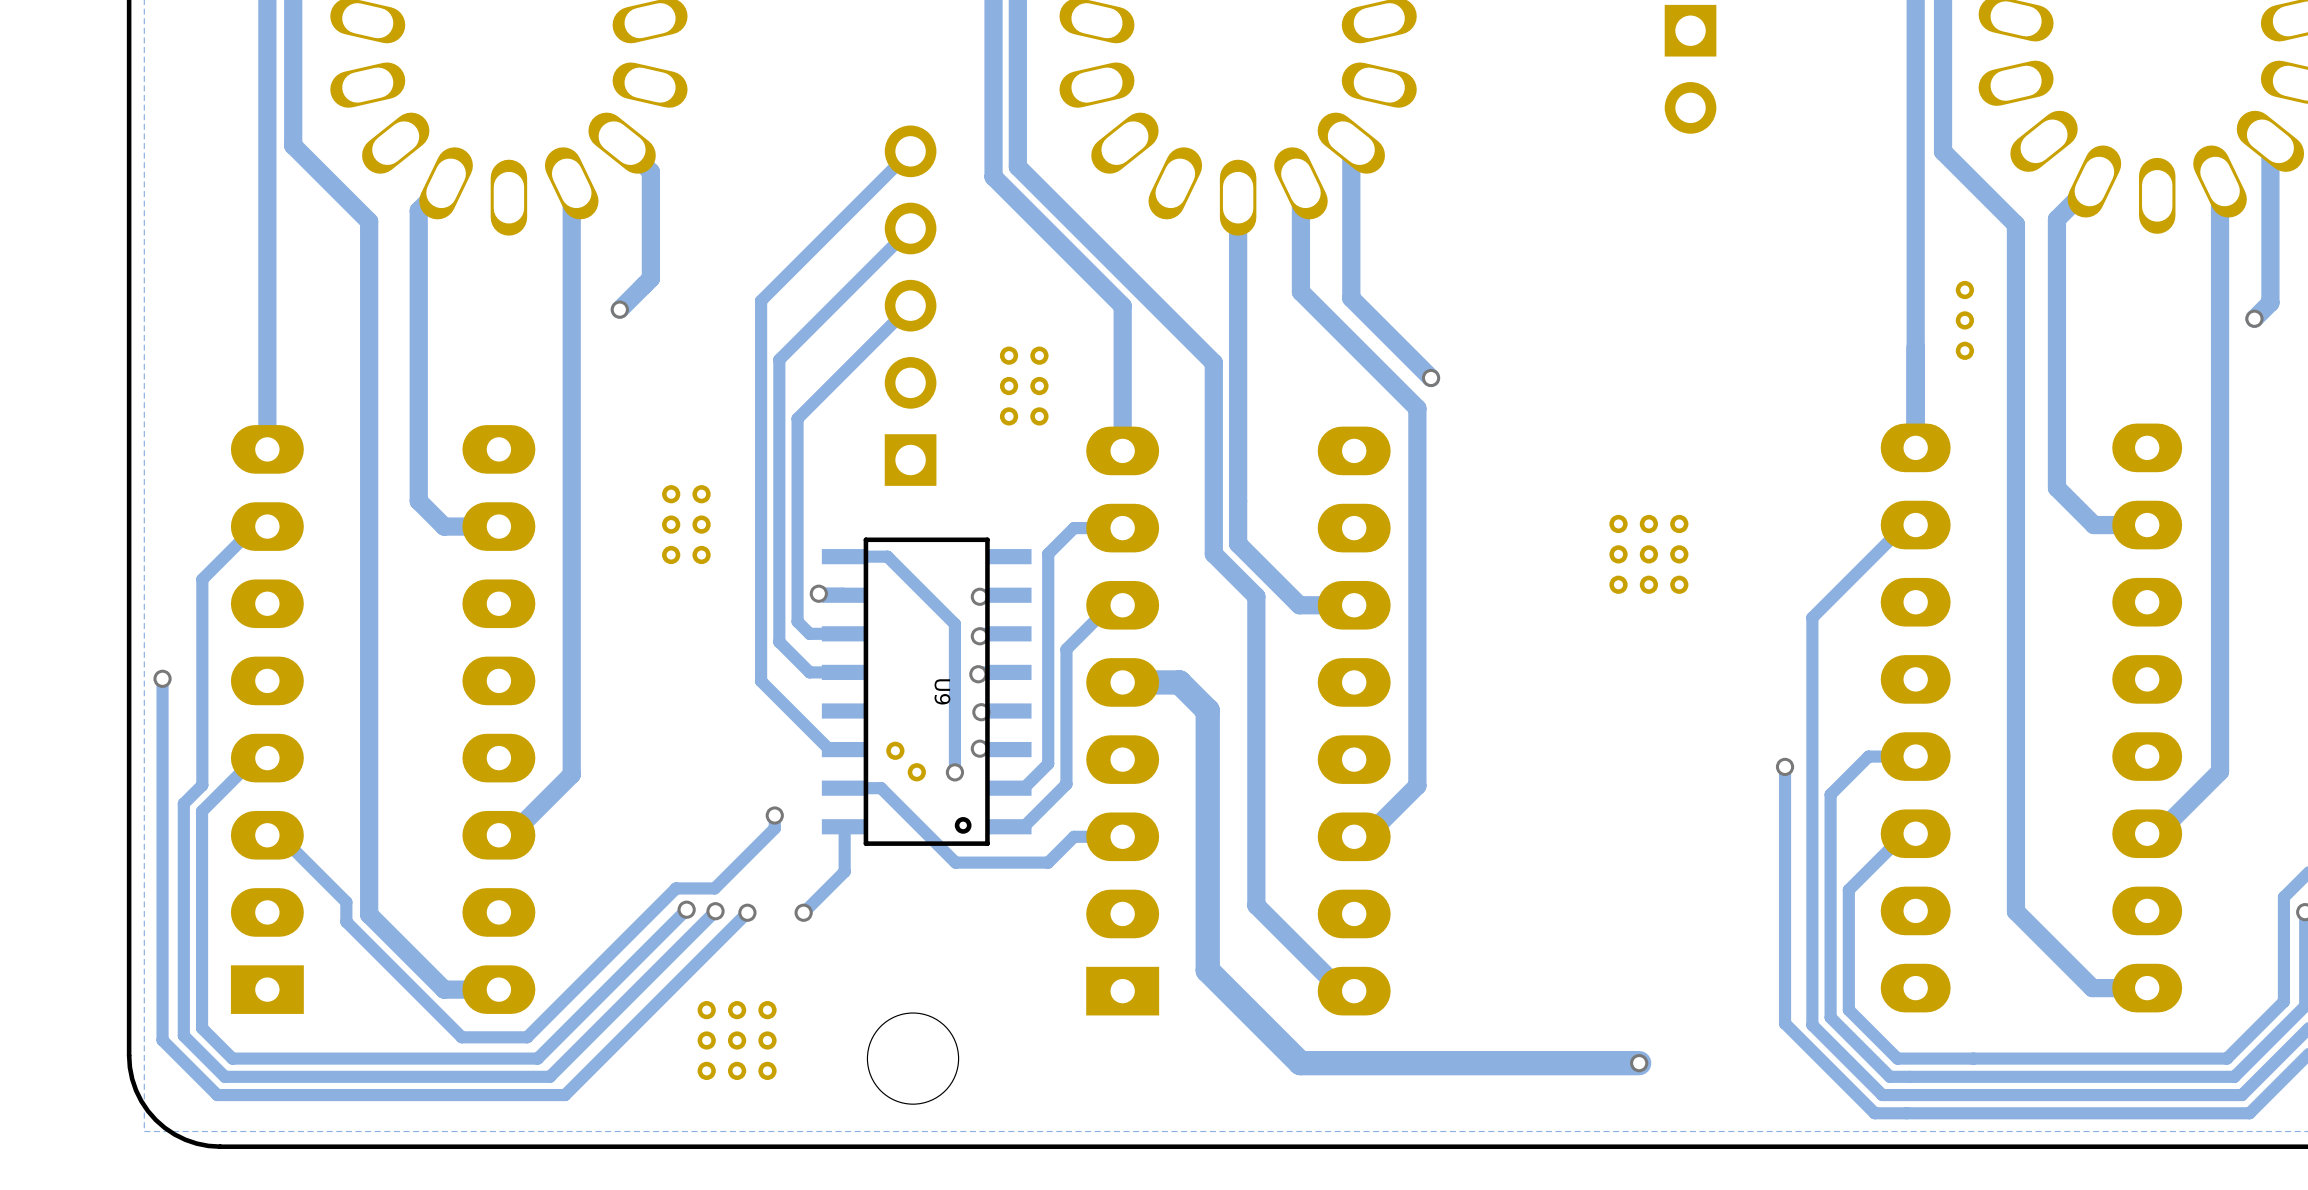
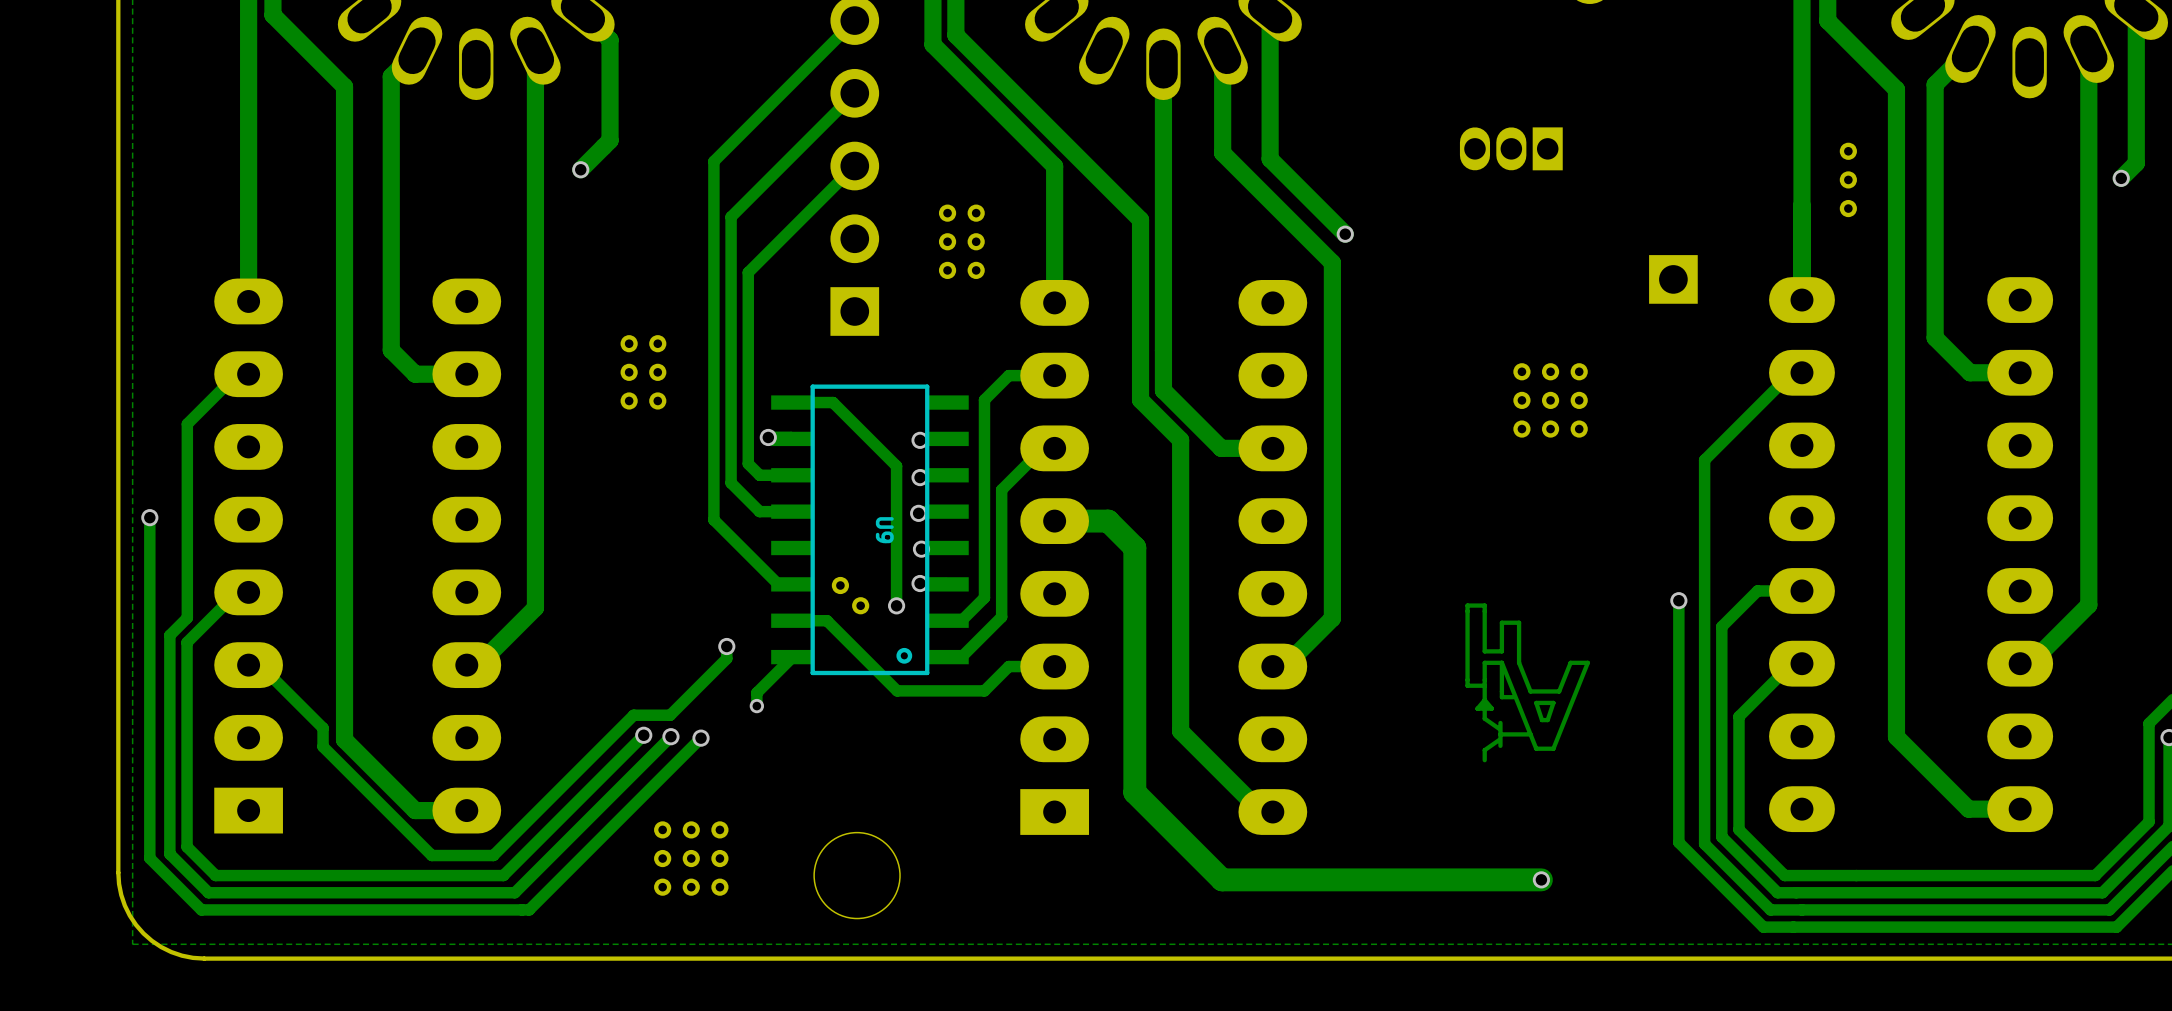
part: none -> (1511, 148)
part: none -> (1673, 279)
drawing: none -> [1465, 603, 1590, 763]
track: (844, 826) (844, 871) (803, 912) -> (792, 657) (756, 692) (756, 706)
via: none -> (756, 706)
via: (803, 912) -> none

